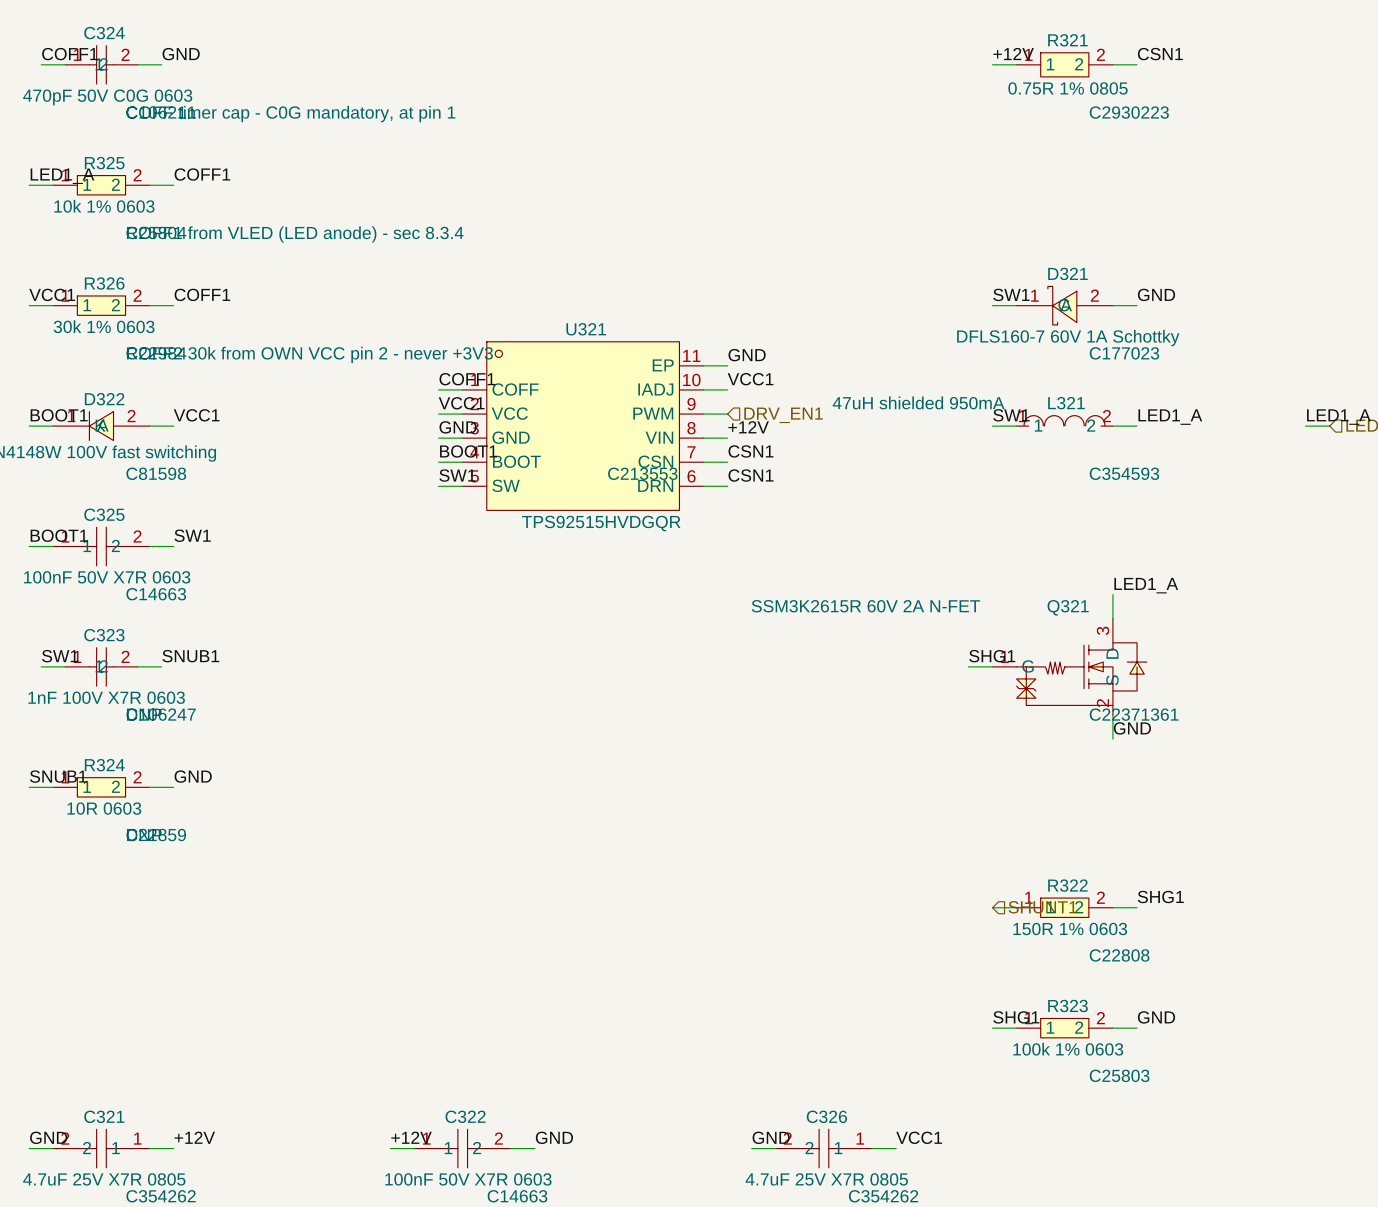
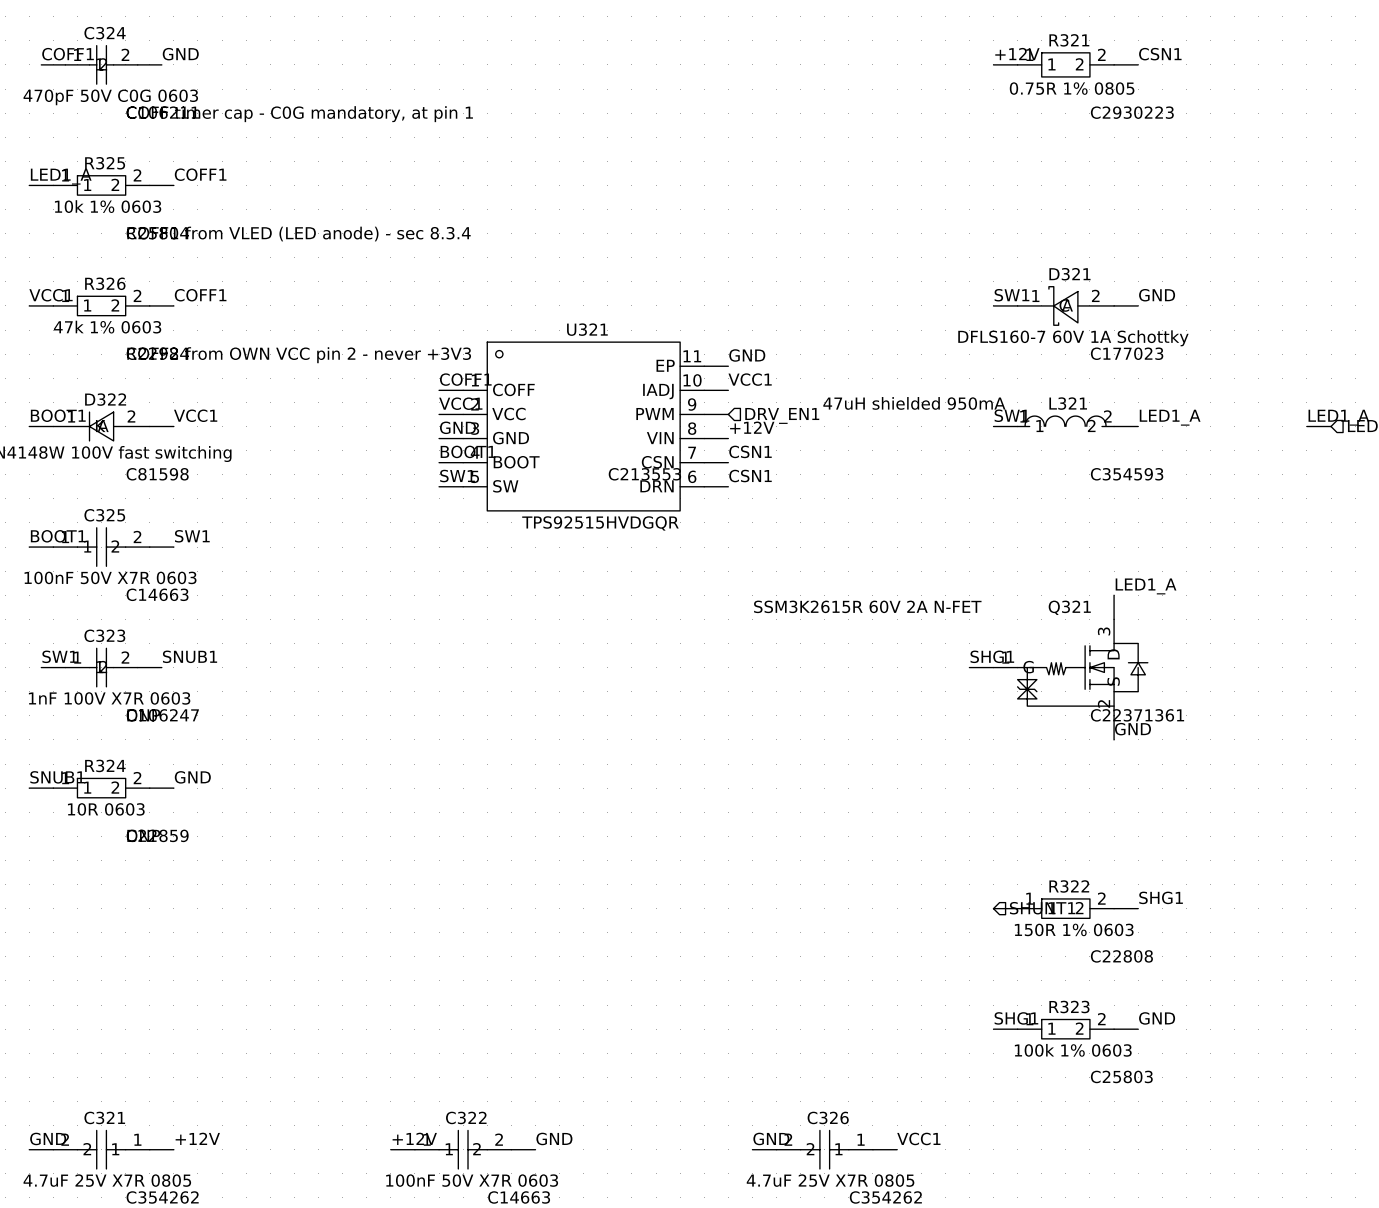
R326 value: 30k 1% 0603 (104, 326) -> 47k 1% 0603 (107, 327)
R326 text: ROFF2 30k from OWN VCC pin 2 - never +3V3 (309, 354) -> ROFF2 from OWN VCC pin 2 - never +3V3 (299, 355)

